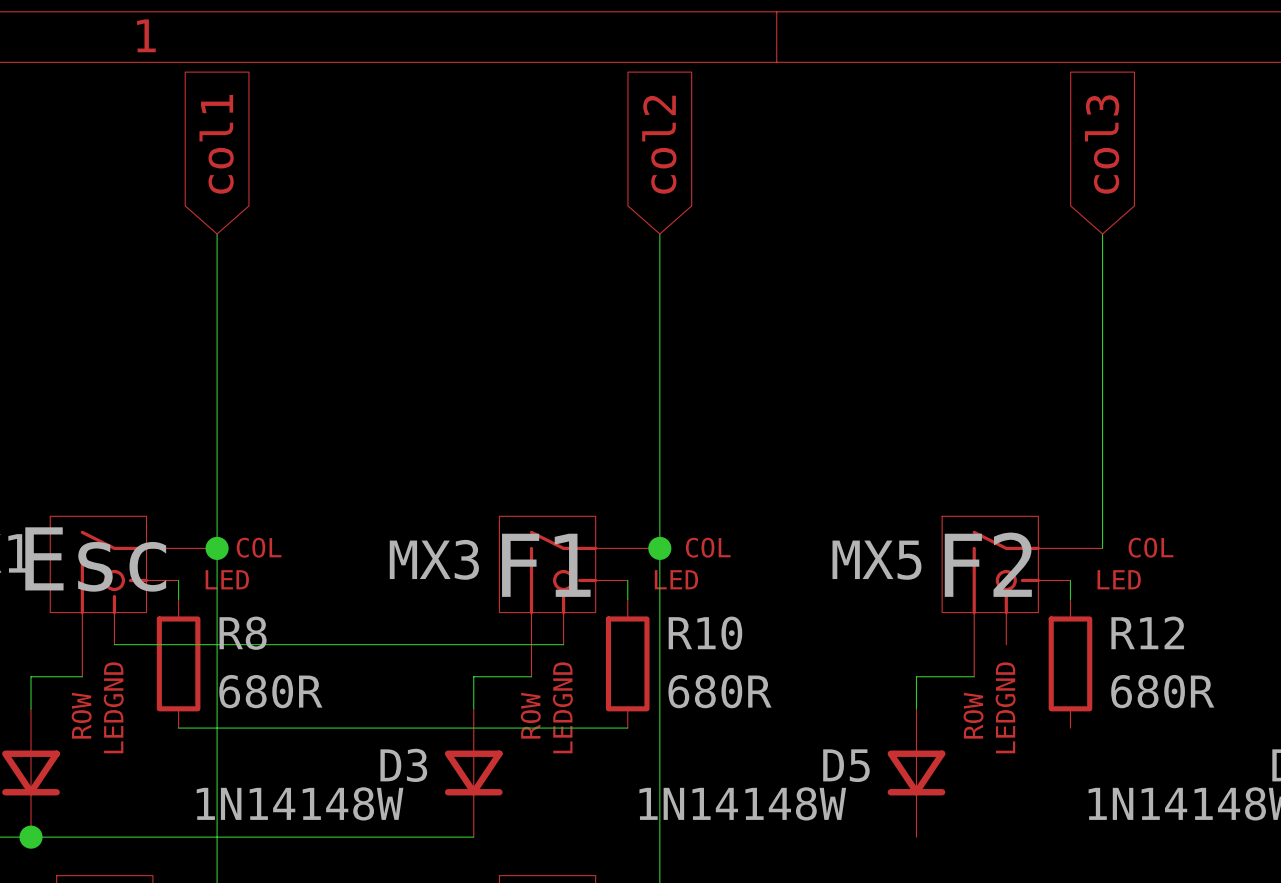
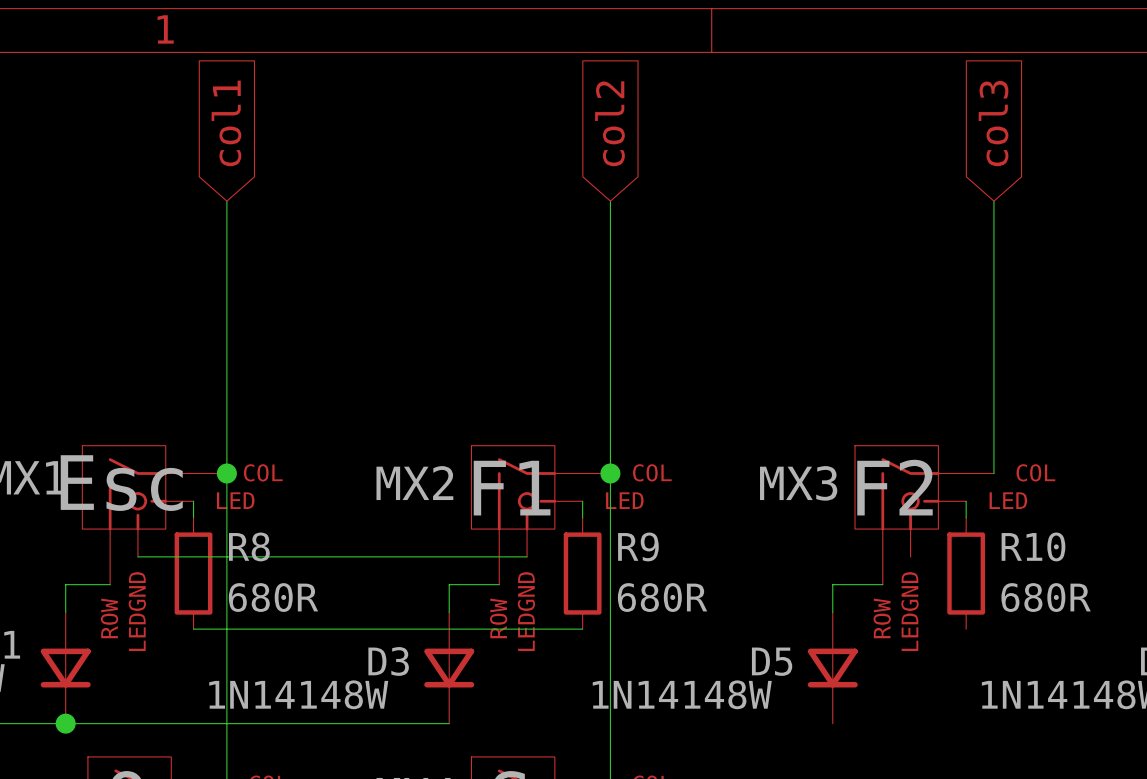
MX3 name: MX3 (434, 559) -> MX2 (414, 483)
MX5 name: MX5 (876, 560) -> MX3 (798, 483)
R12 name: R12 (1147, 632) -> R10 (1033, 546)
R10 name: R10 (705, 633) -> R9 (638, 546)

